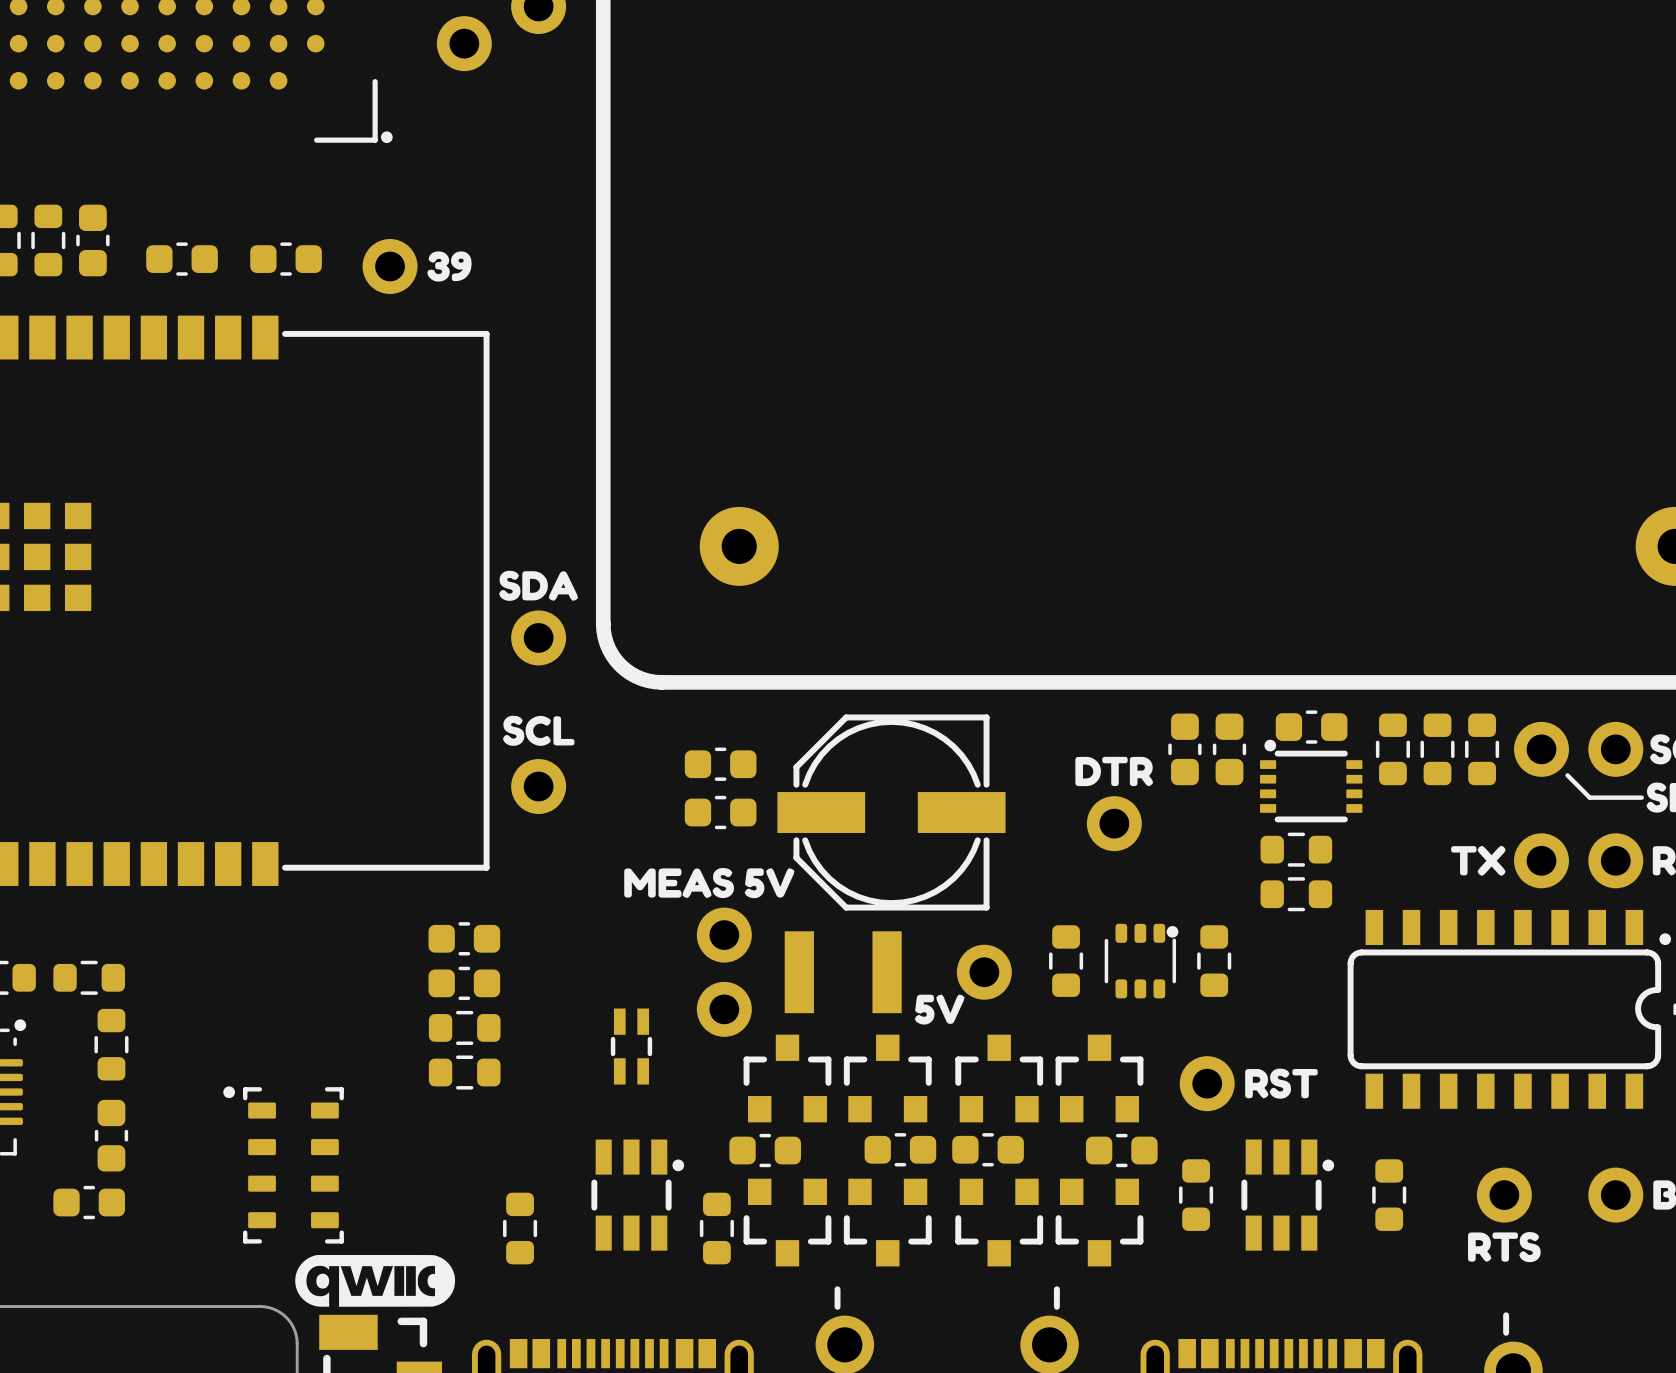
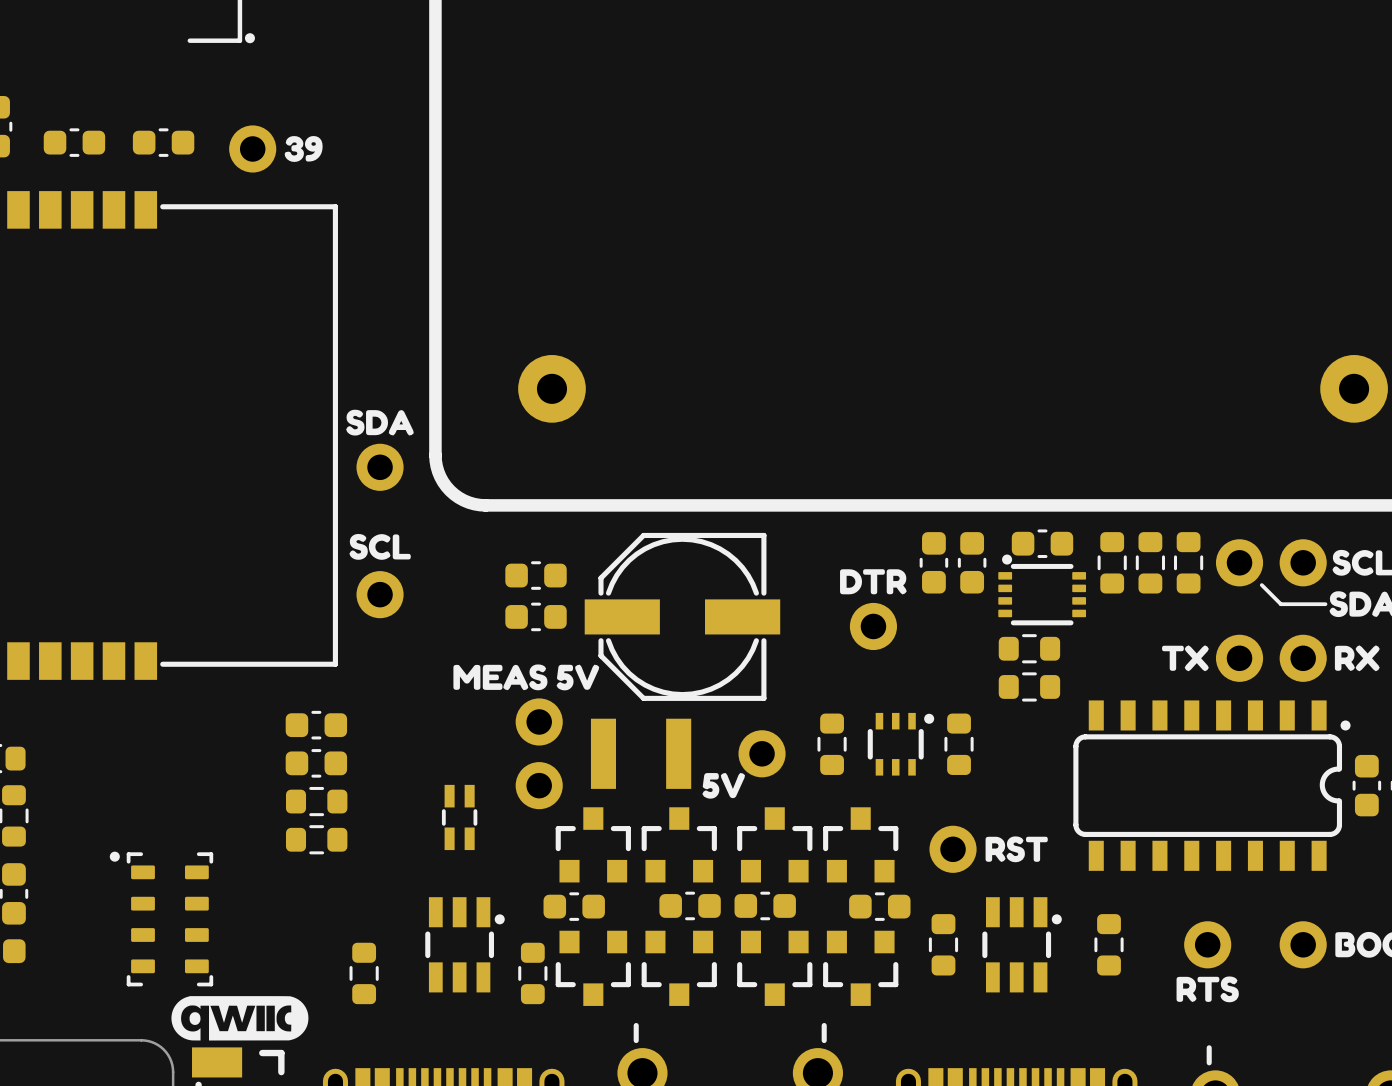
part footprint: [1104, 923, 1179, 999] -> [867, 712, 935, 776]

